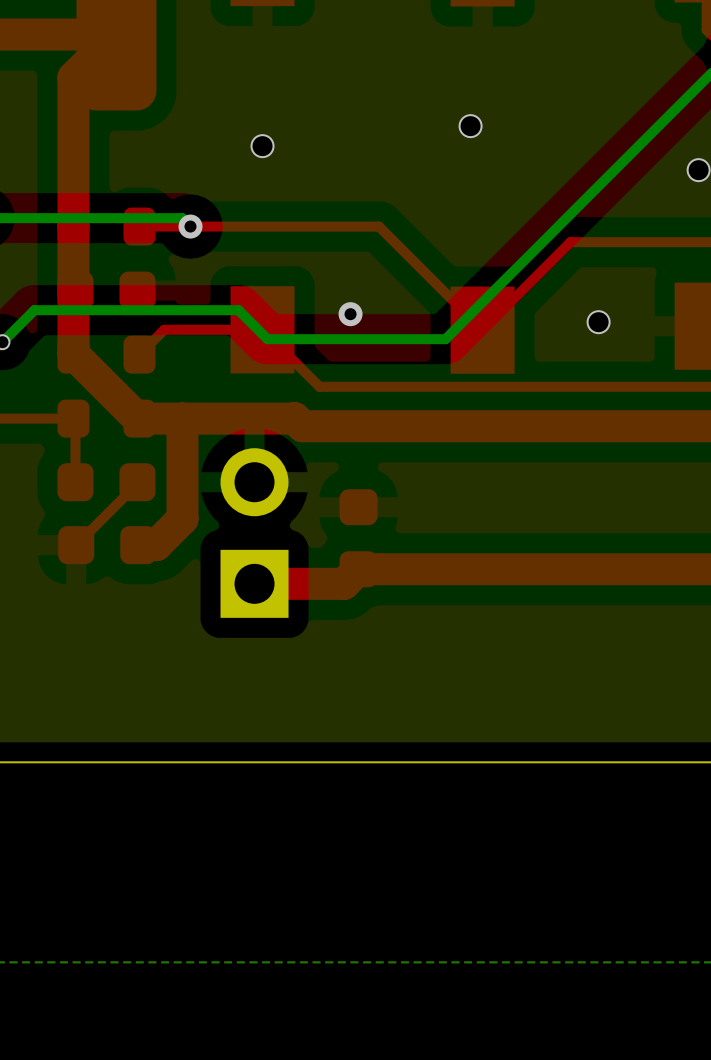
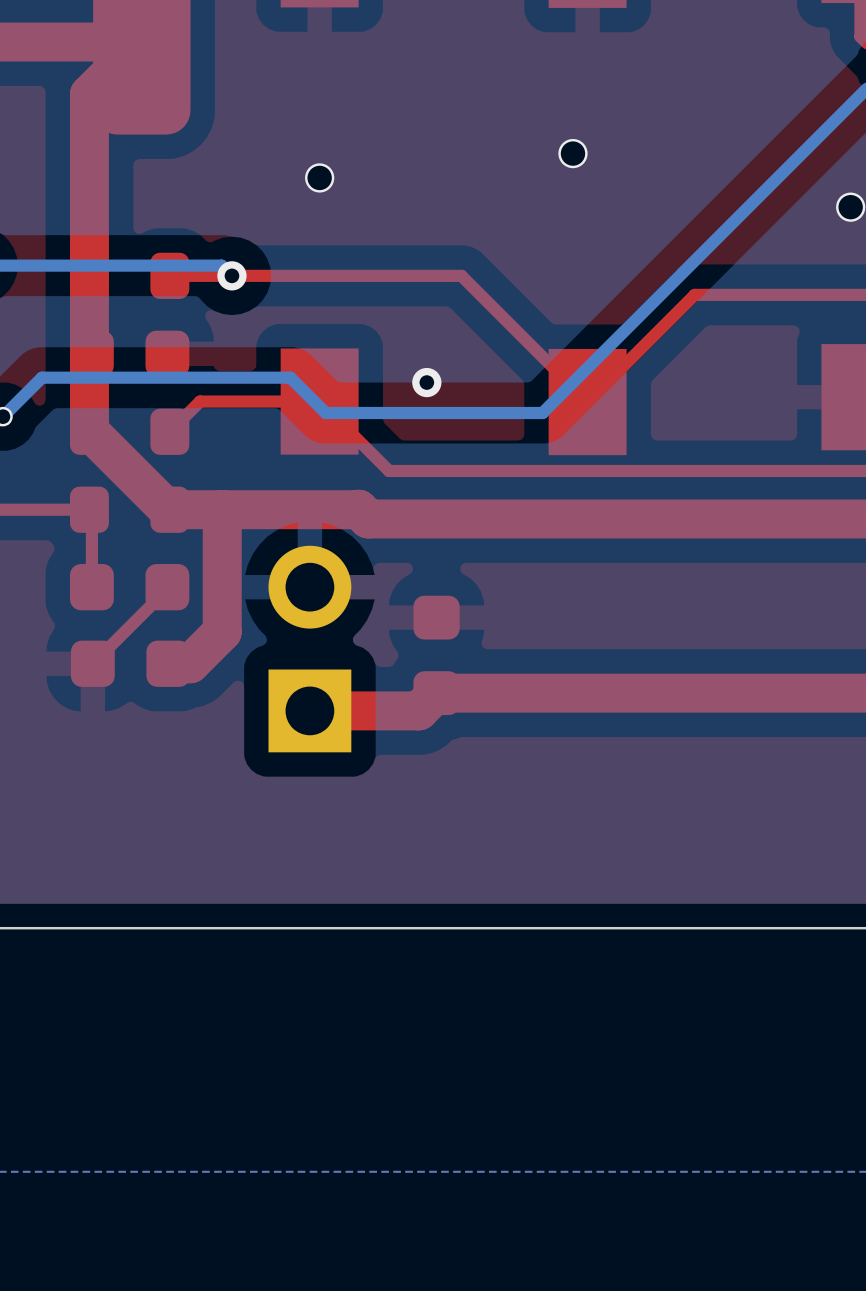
via: (598, 322) -> none

